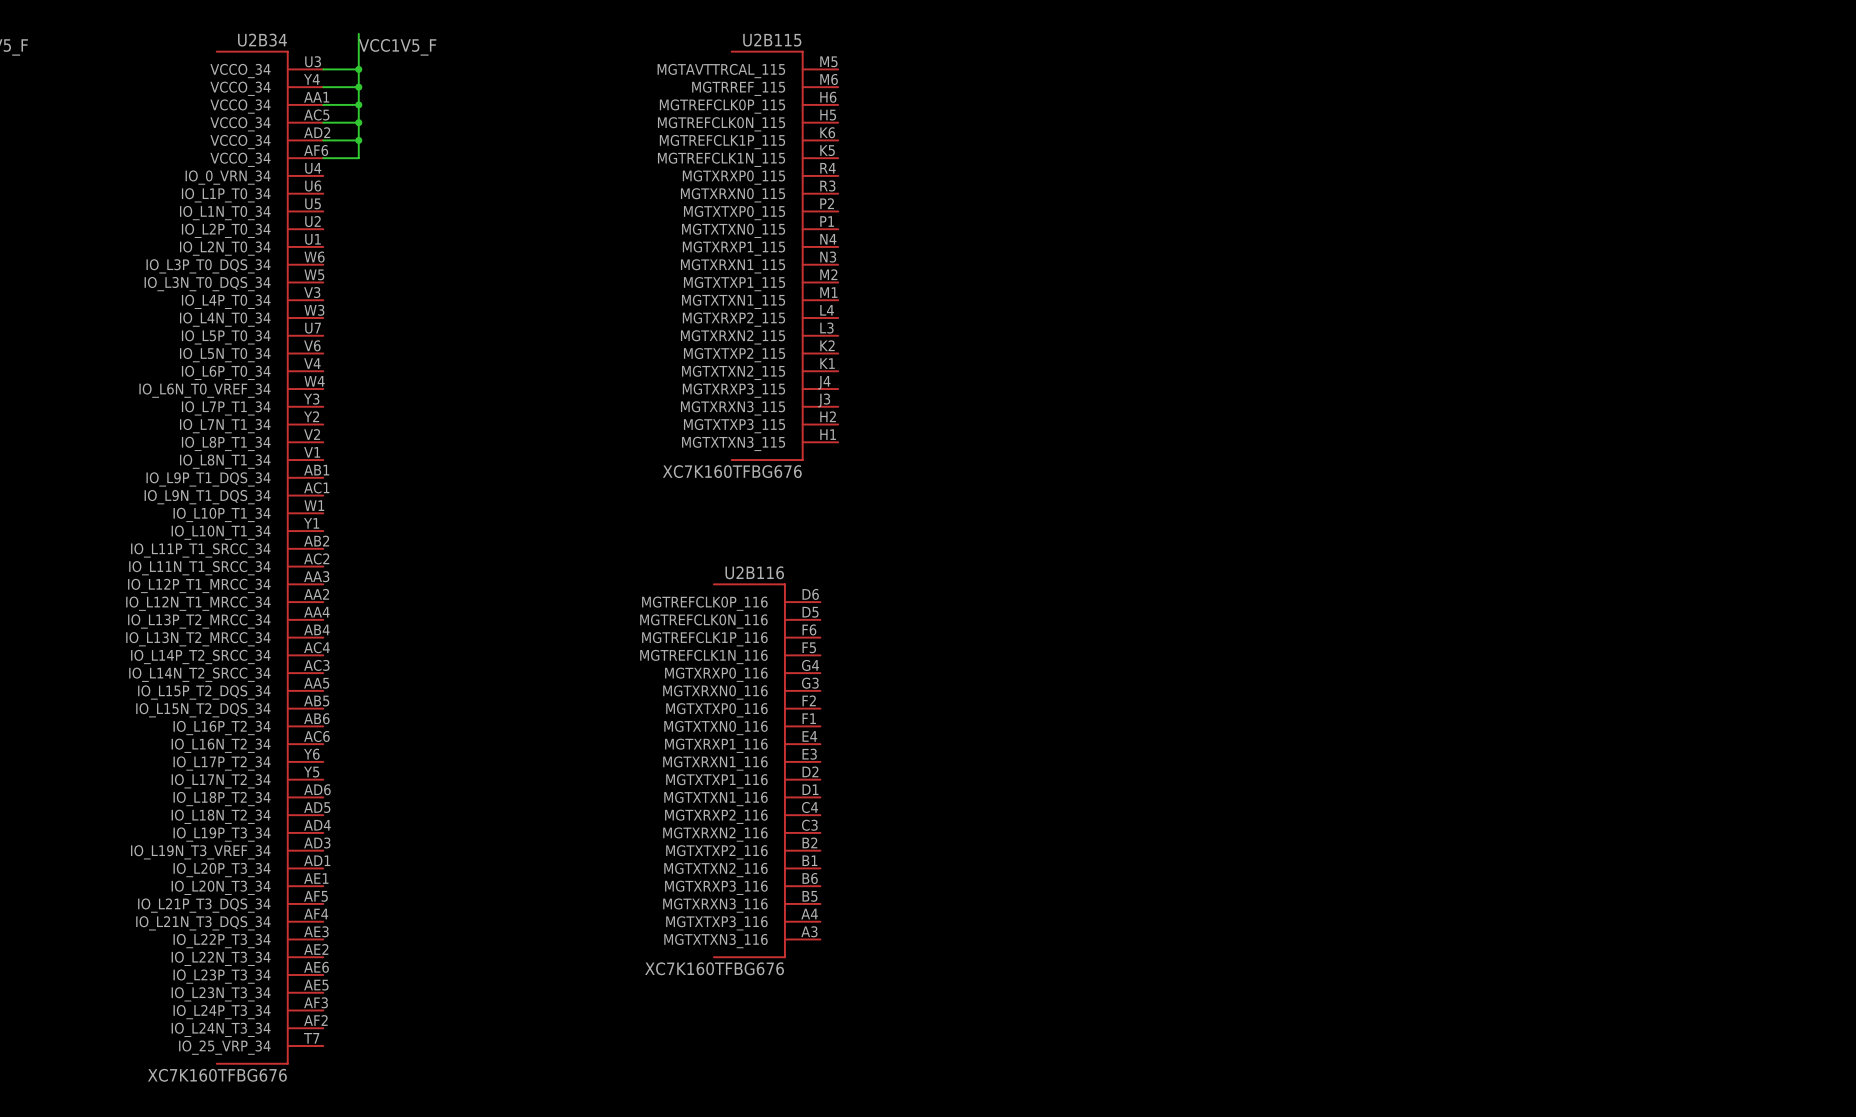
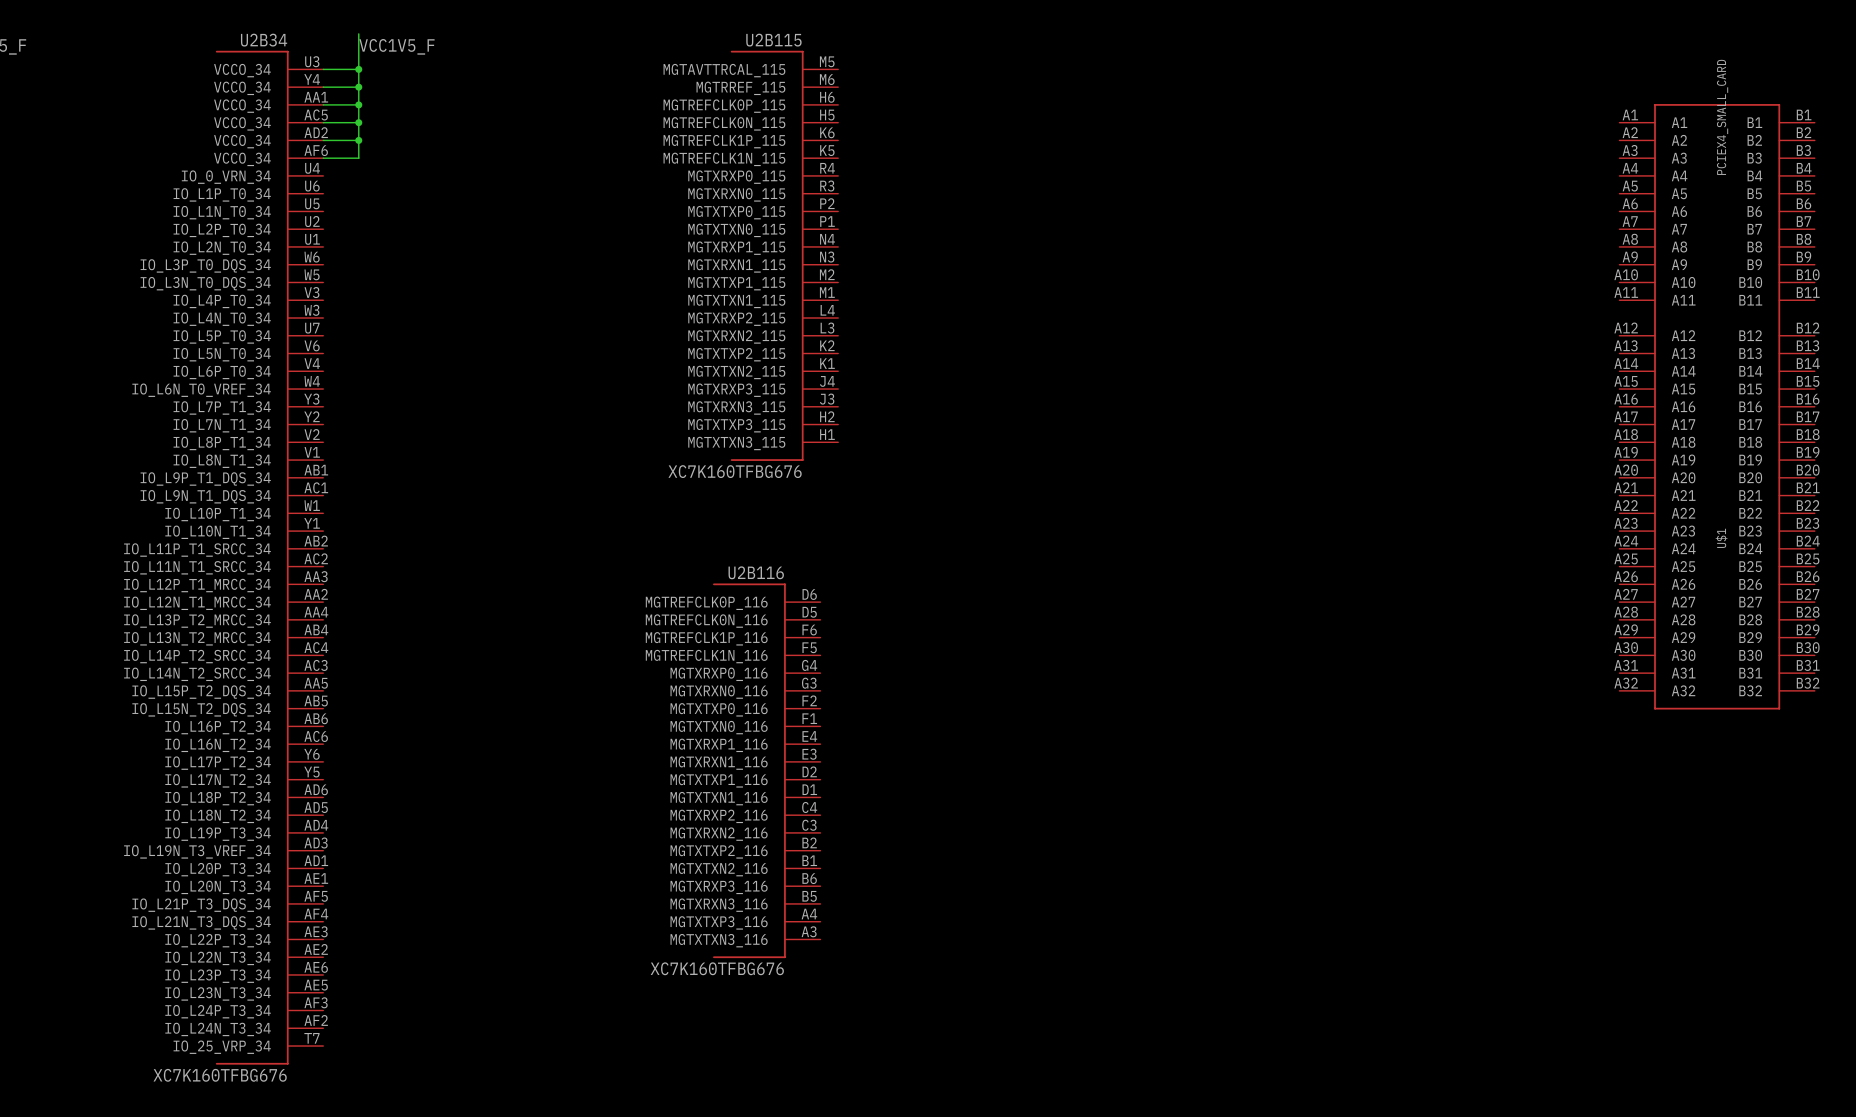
U$1: none -> PCIEX4_SMALL_CARD (1717, 406)

